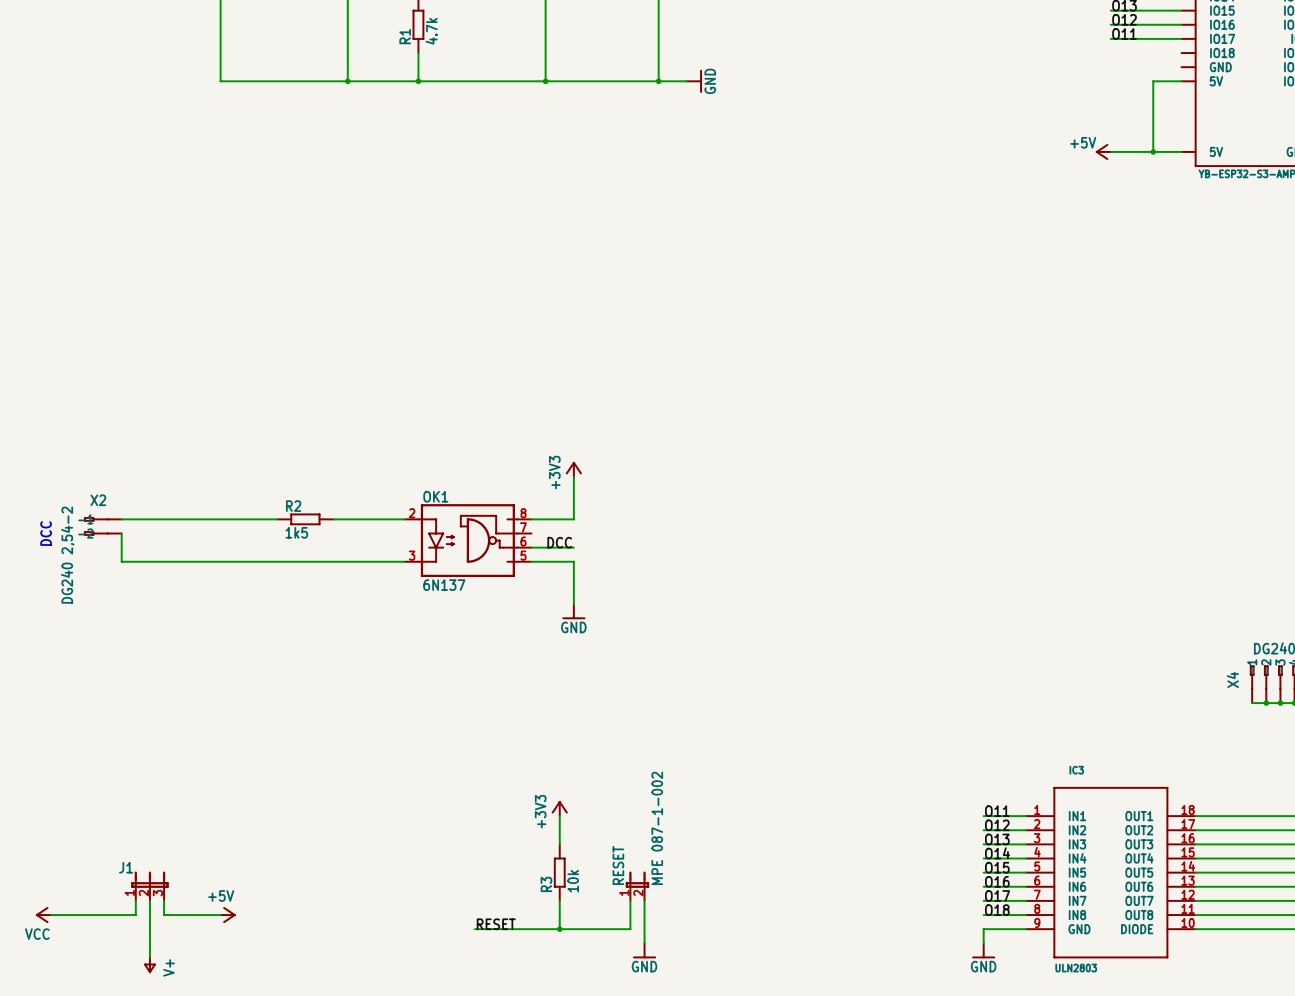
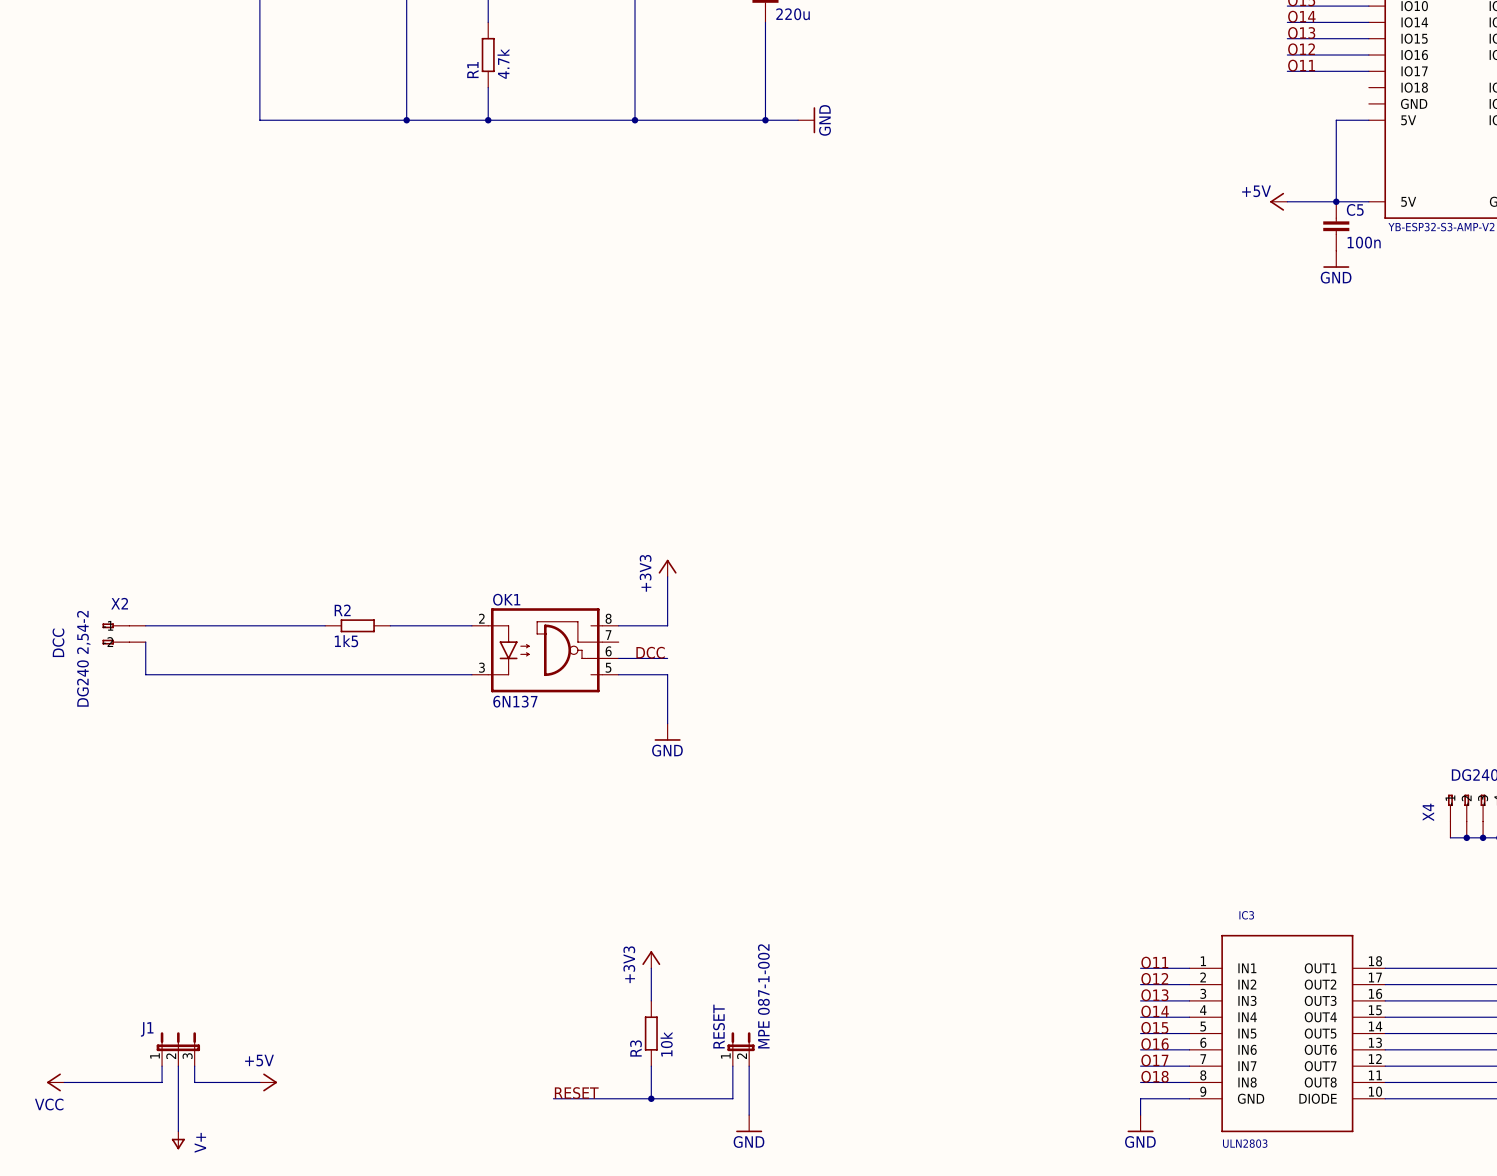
C5: none -> 100n (1336, 226)
power symbol: none -> GND (1336, 259)

